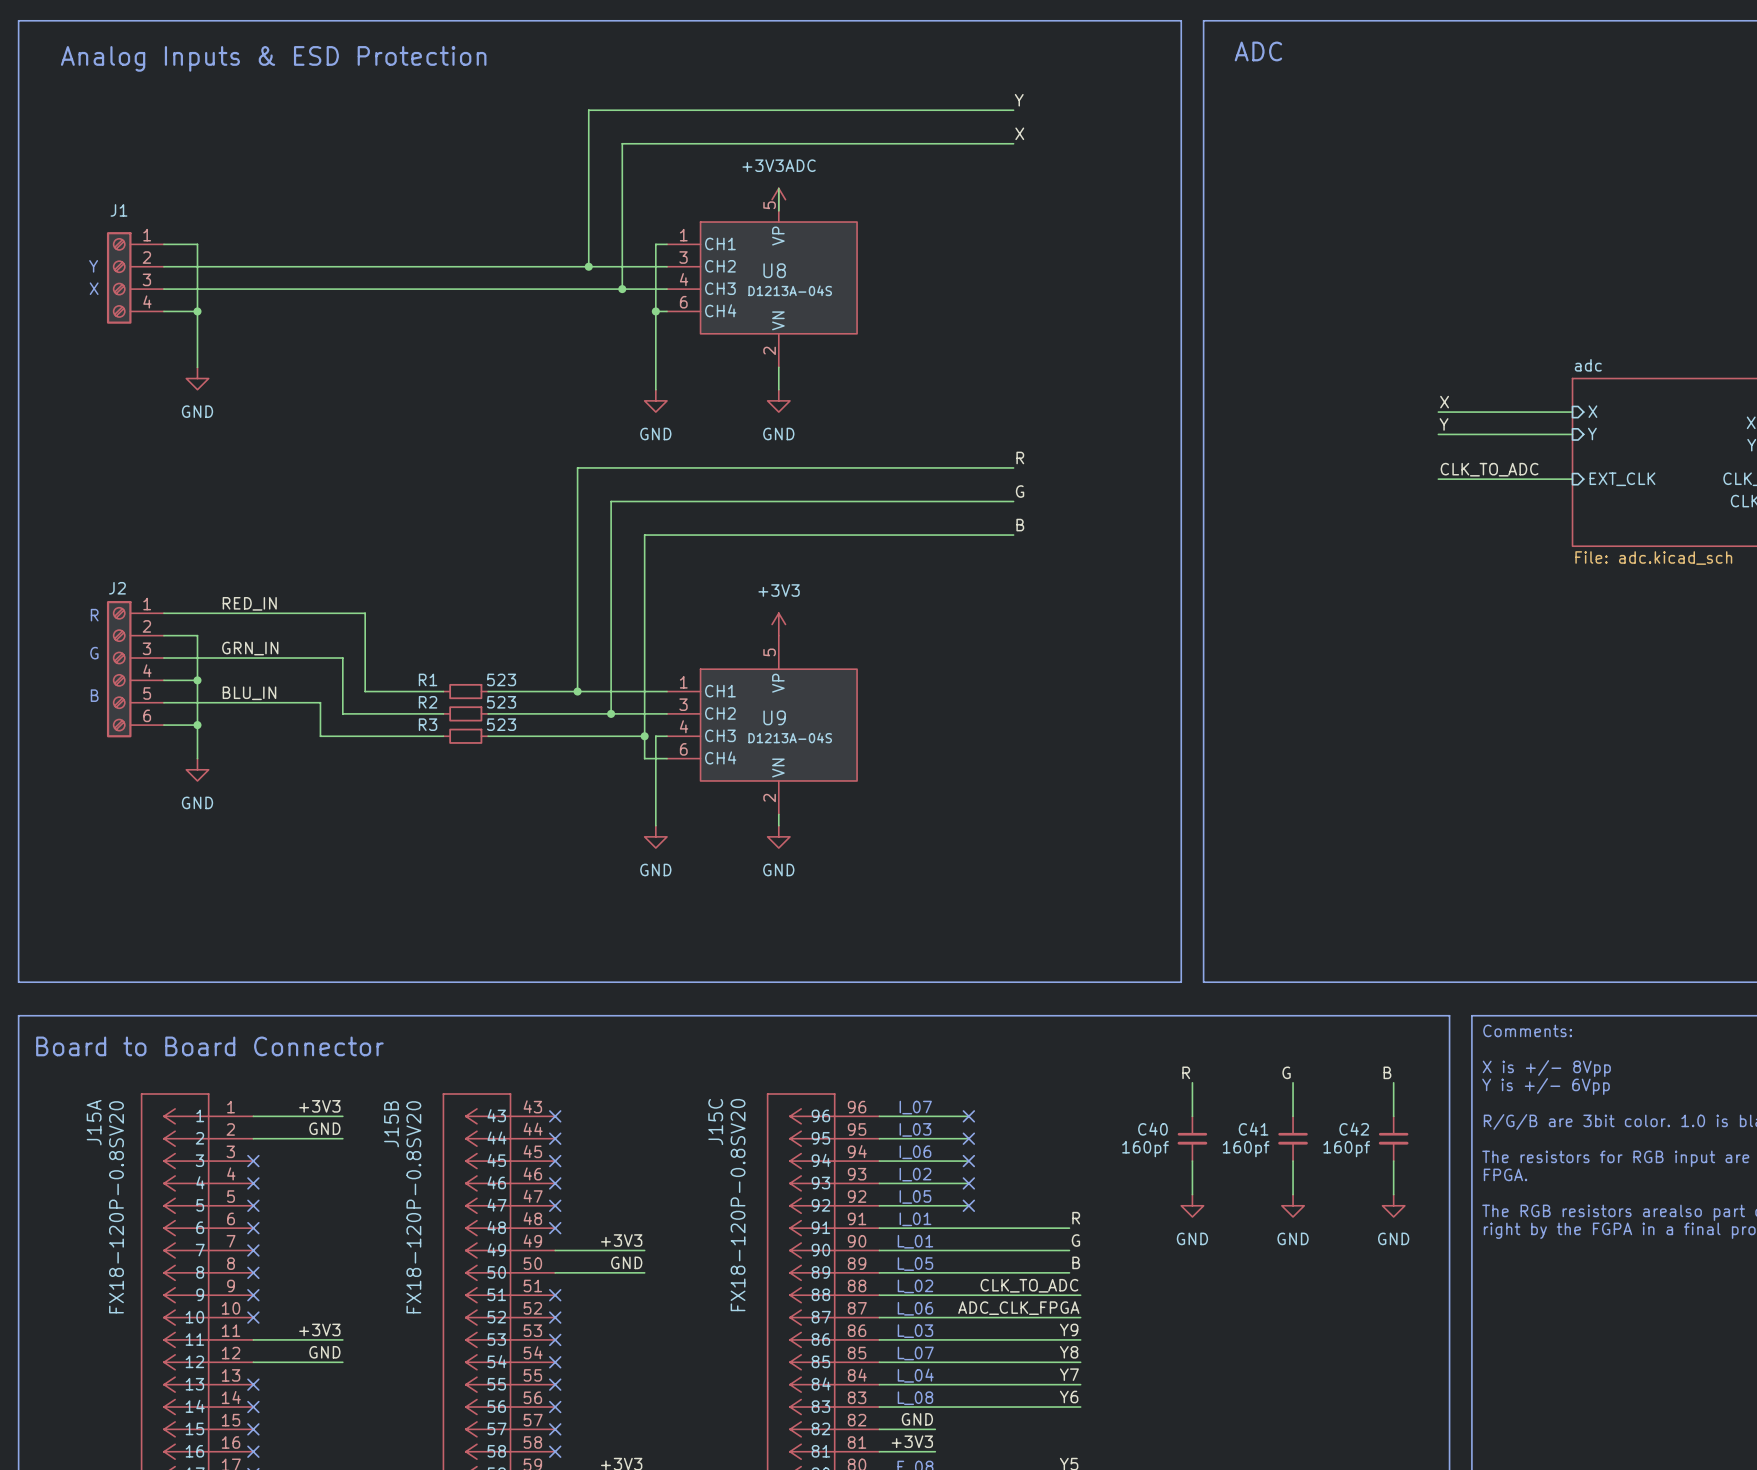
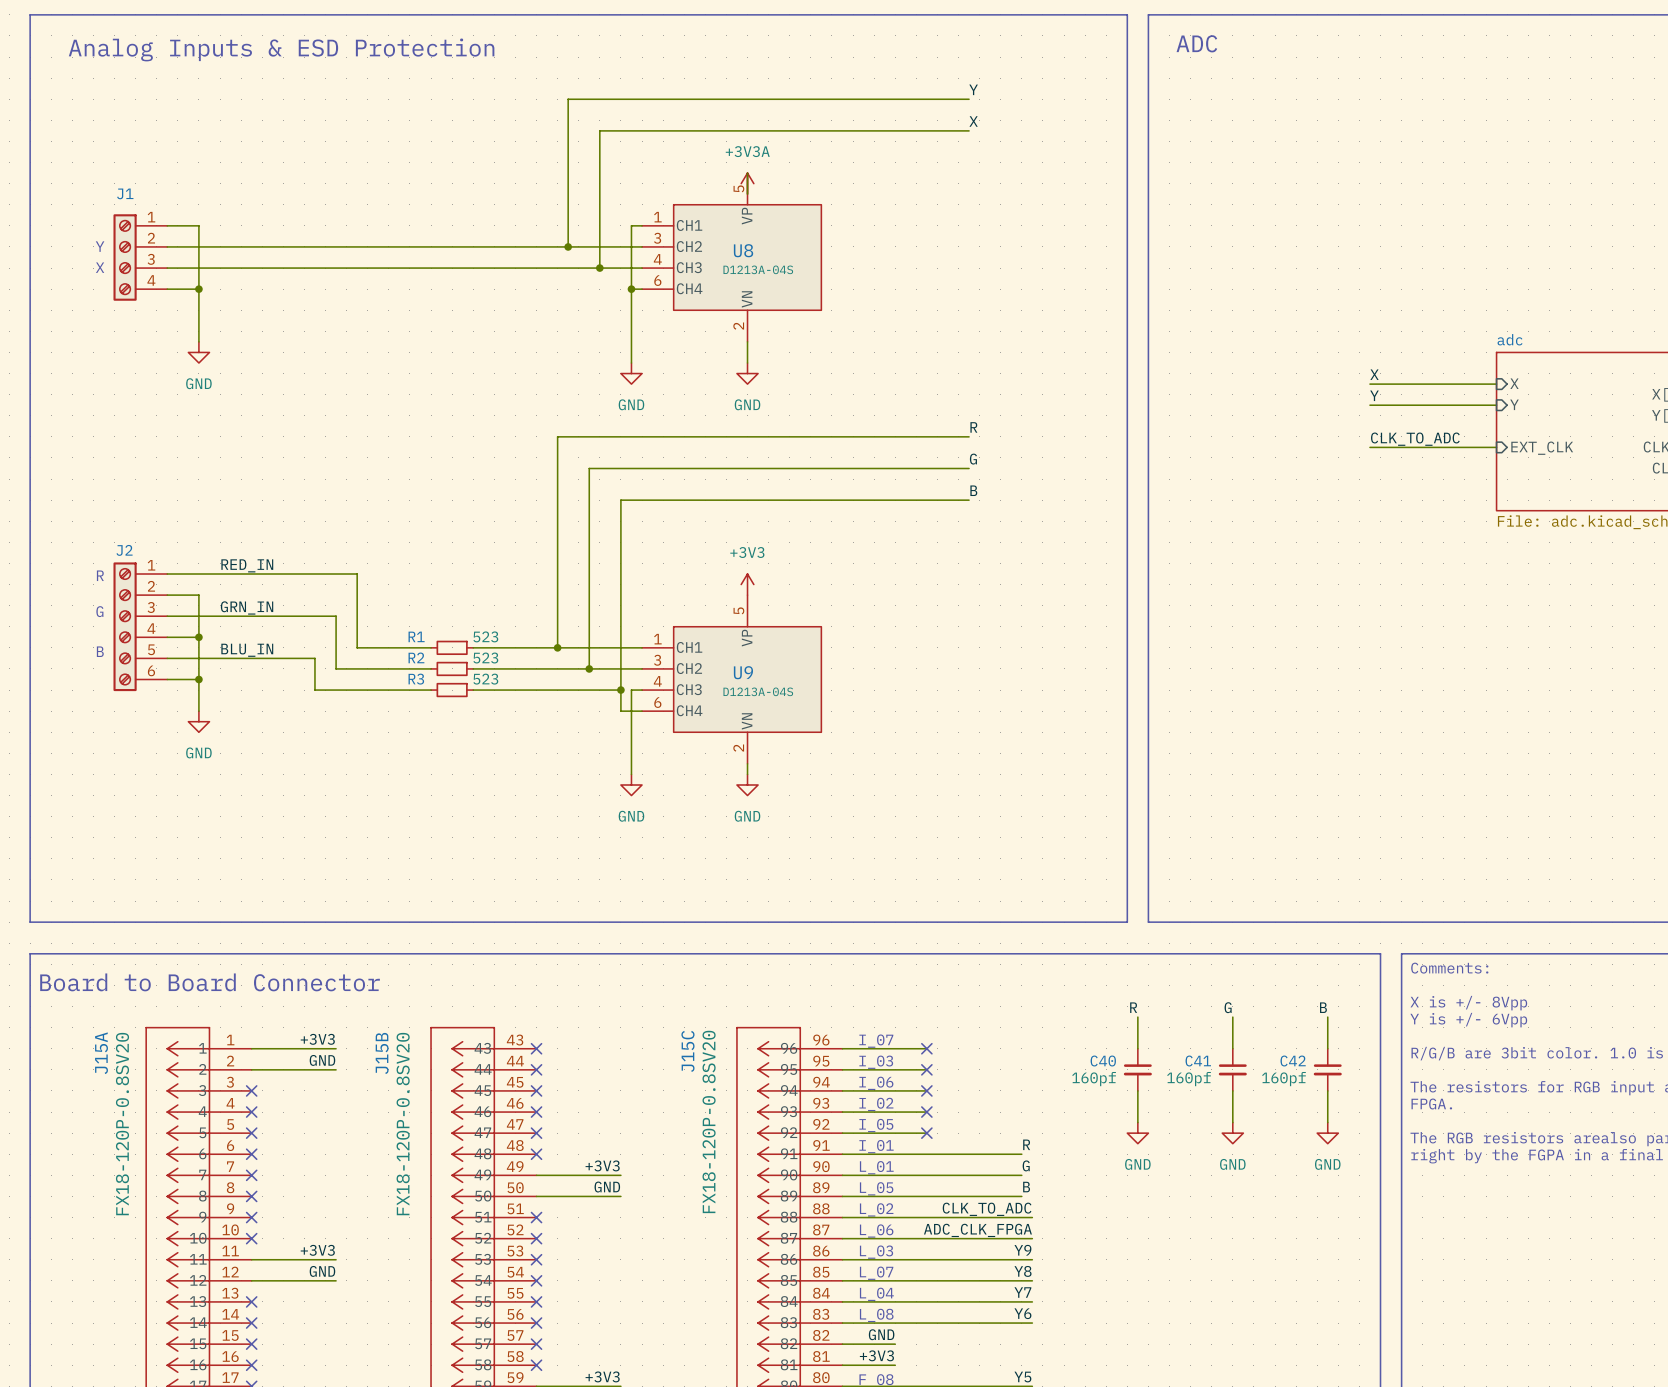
power symbol: +3V3ADC (778, 199) -> +3V3A (747, 183)

